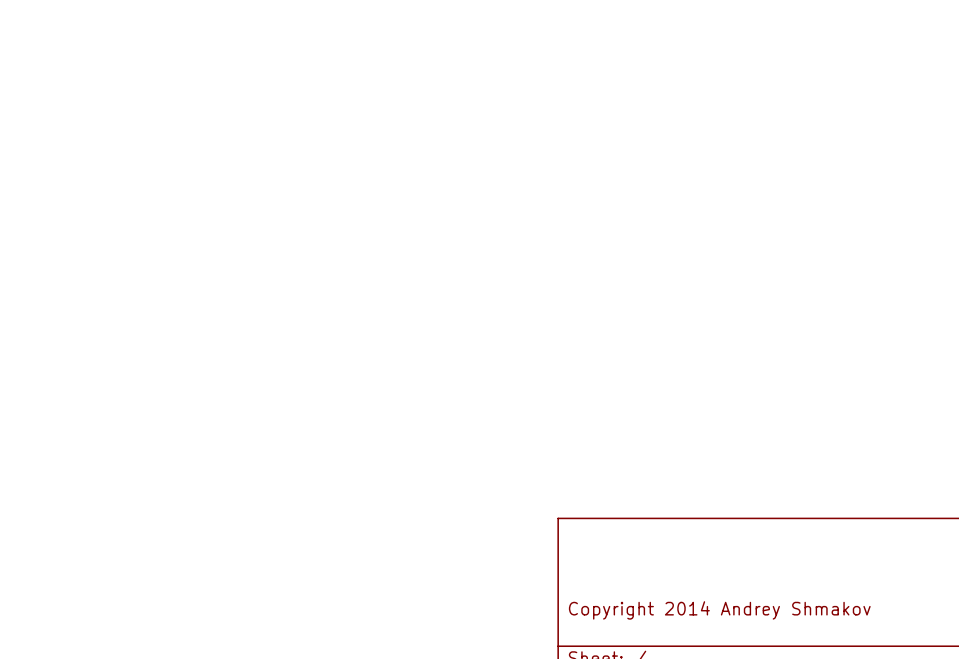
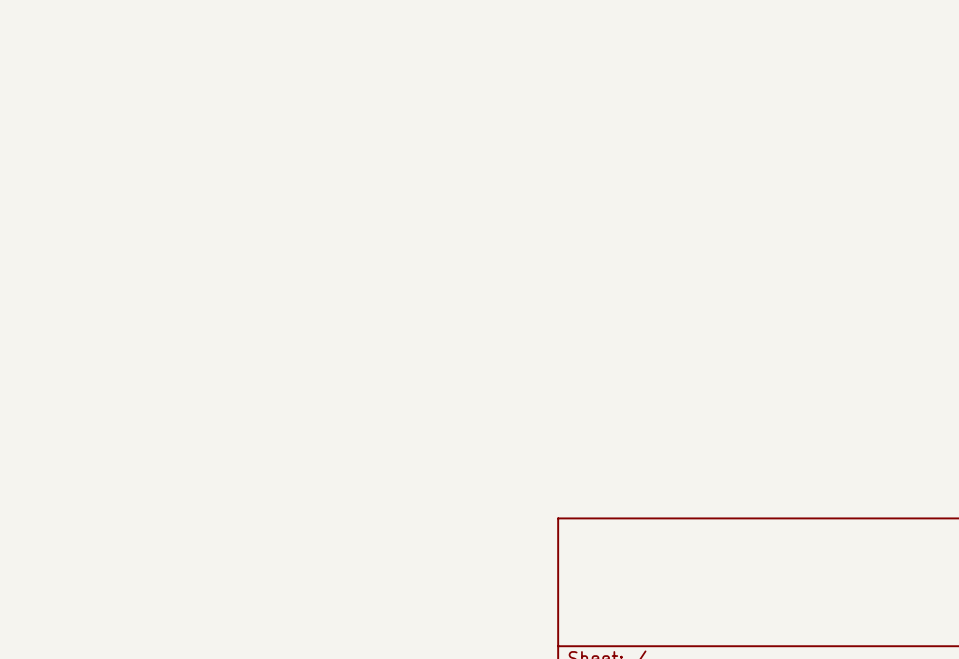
title block: Copyright 2014 Andrey Shmakov (719, 610) -> none

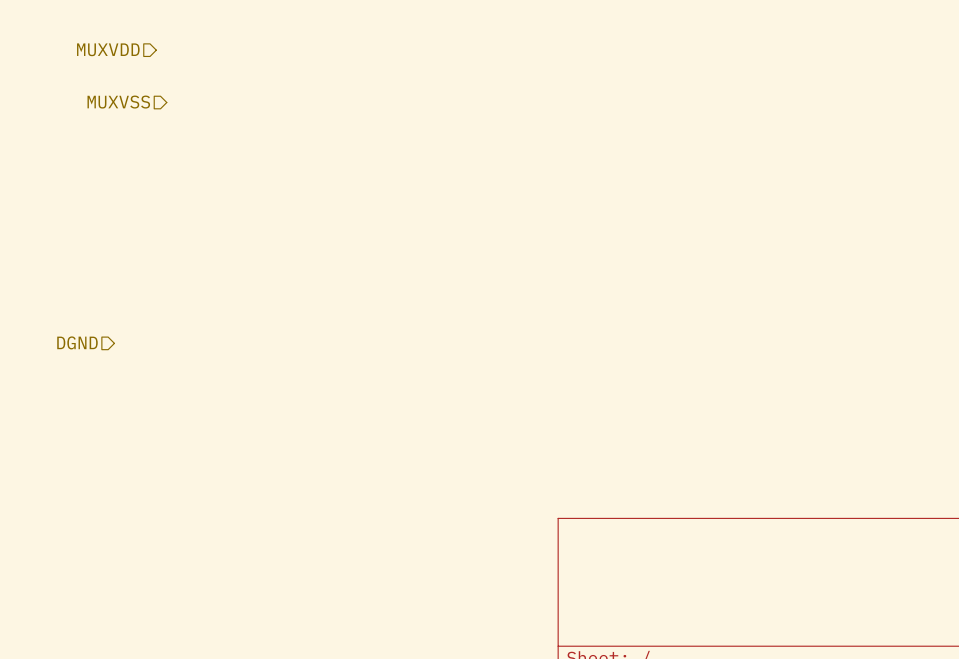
hierarchical label: none -> MUXVDD (108, 49)
hierarchical label: none -> MUXVSS (118, 102)
hierarchical label: none -> DGND (77, 342)

